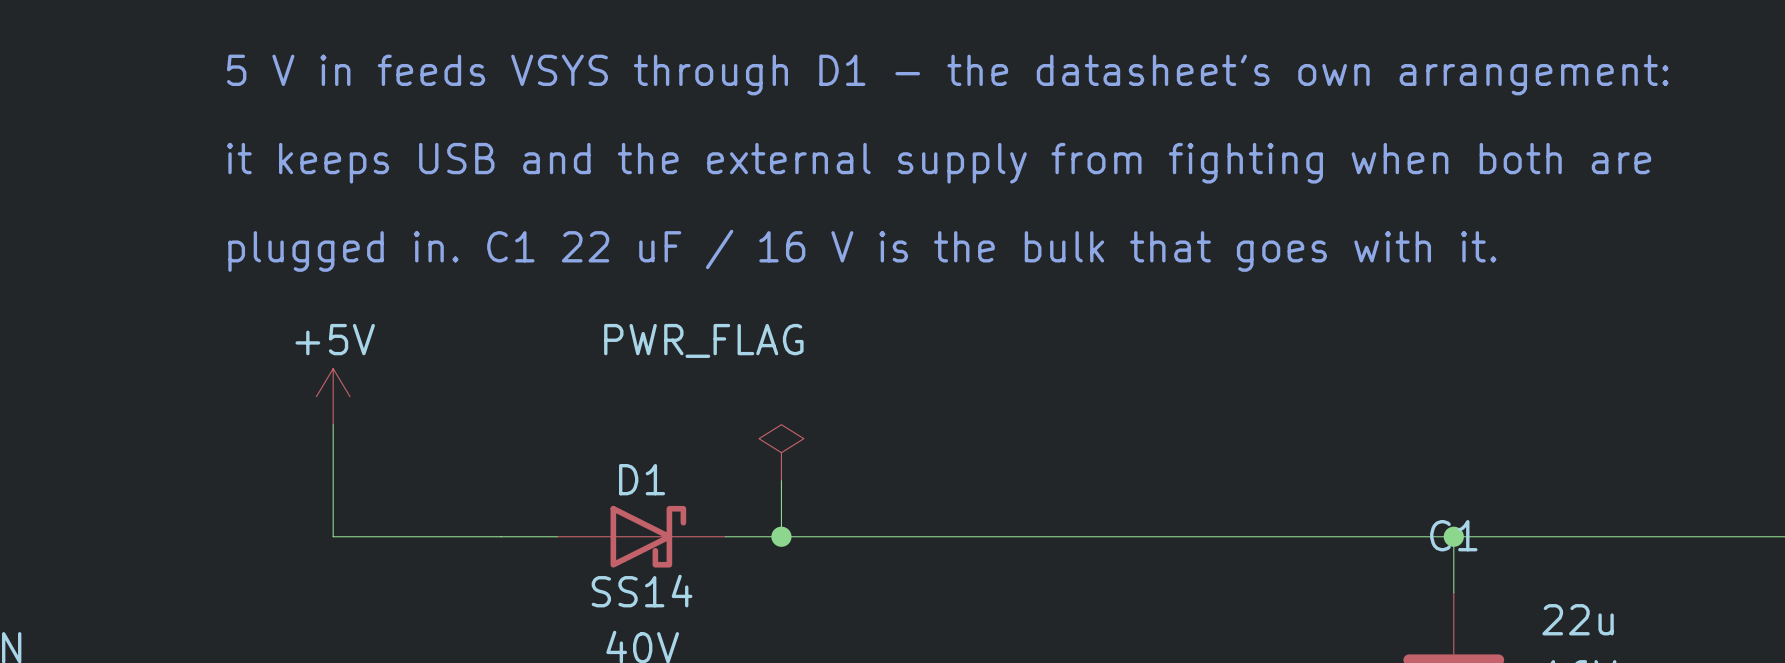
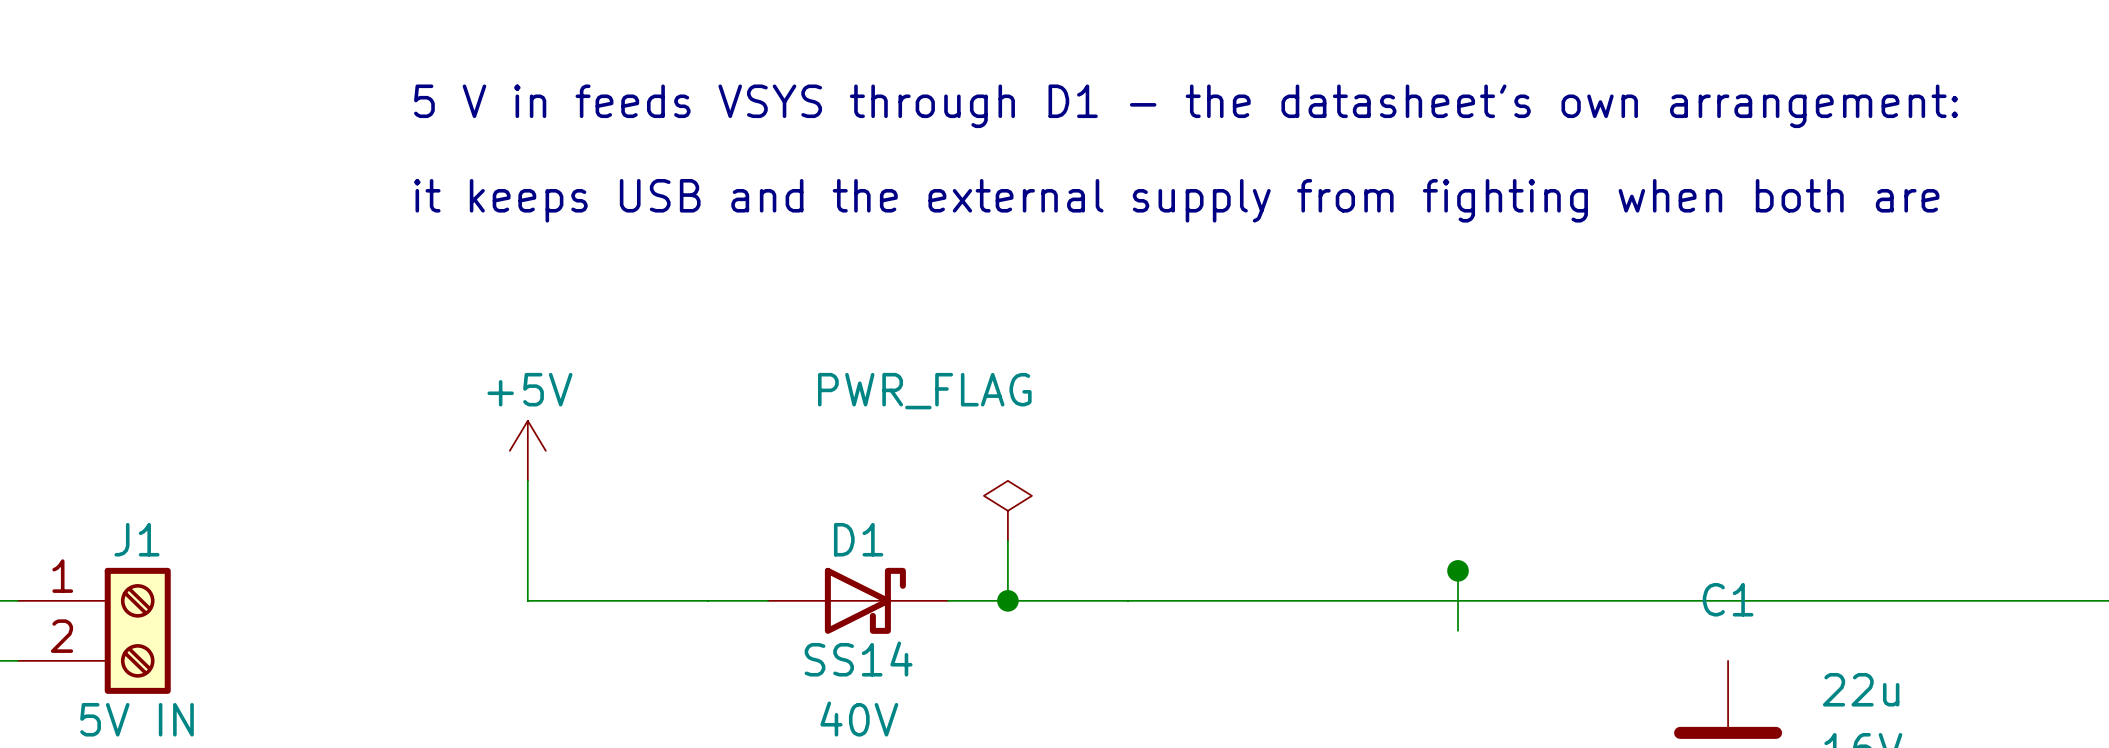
text: plugged in. C1 22 uF / 16 V is the bulk that goes with it. (862, 250) -> none
junction: none -> (1458, 570)
wire: (1453, 536) (1453, 592) -> (1458, 570) (1458, 630)
junction: (1453, 536) -> none

